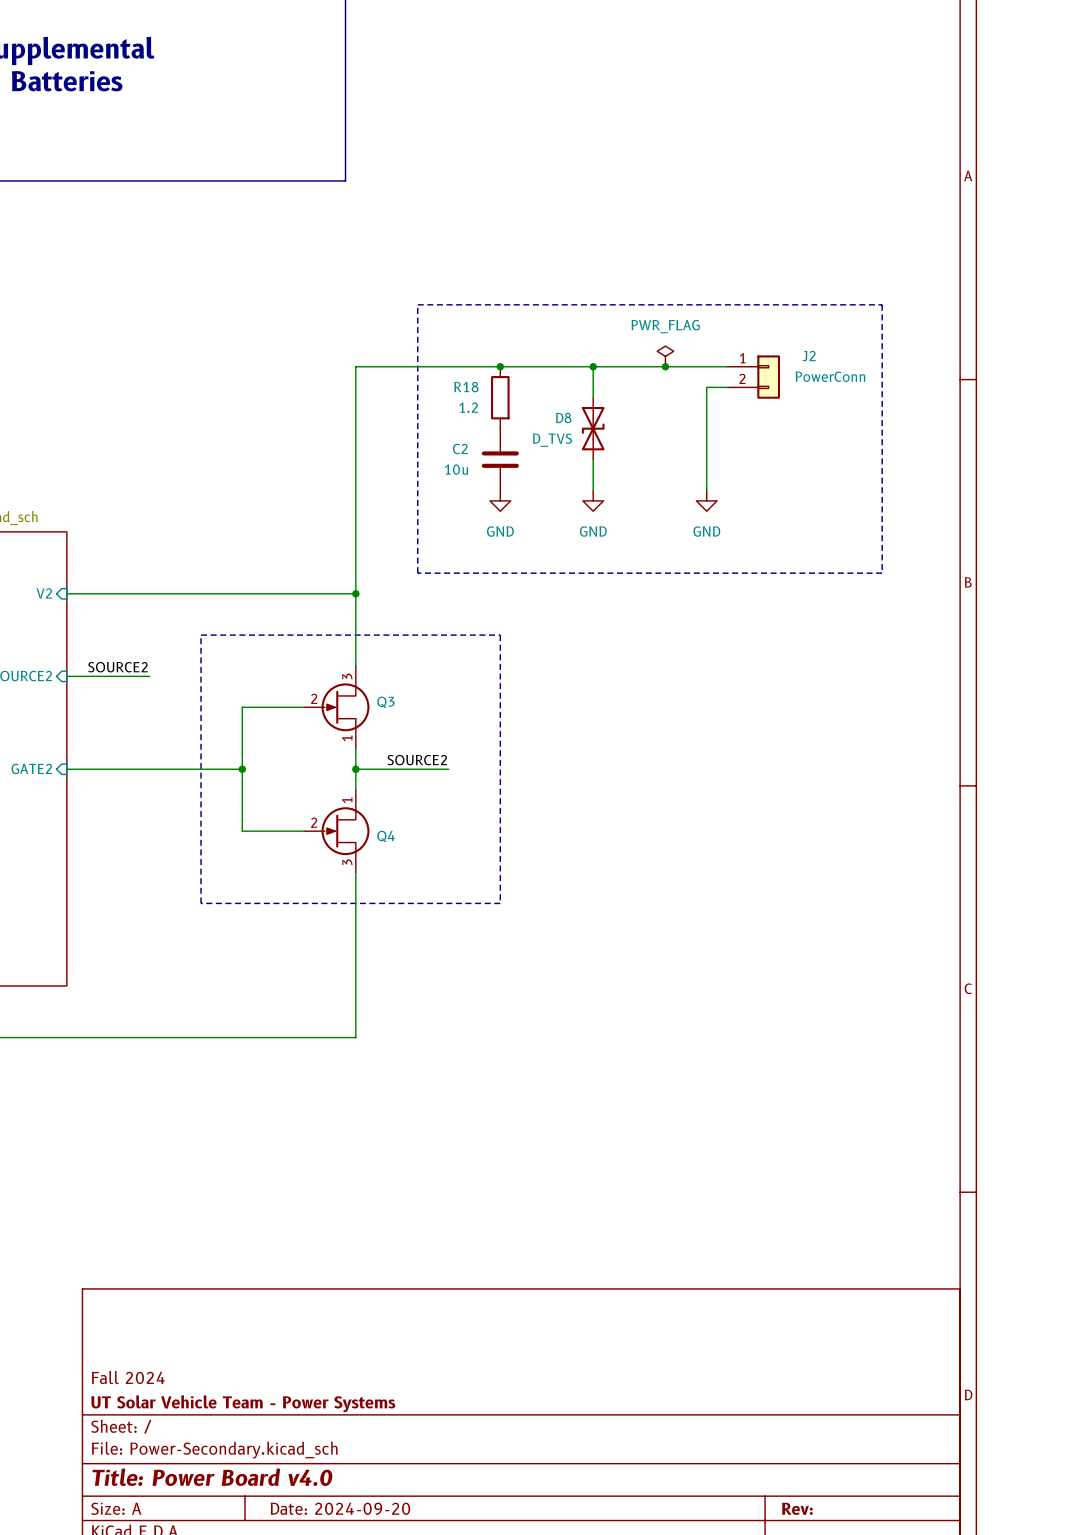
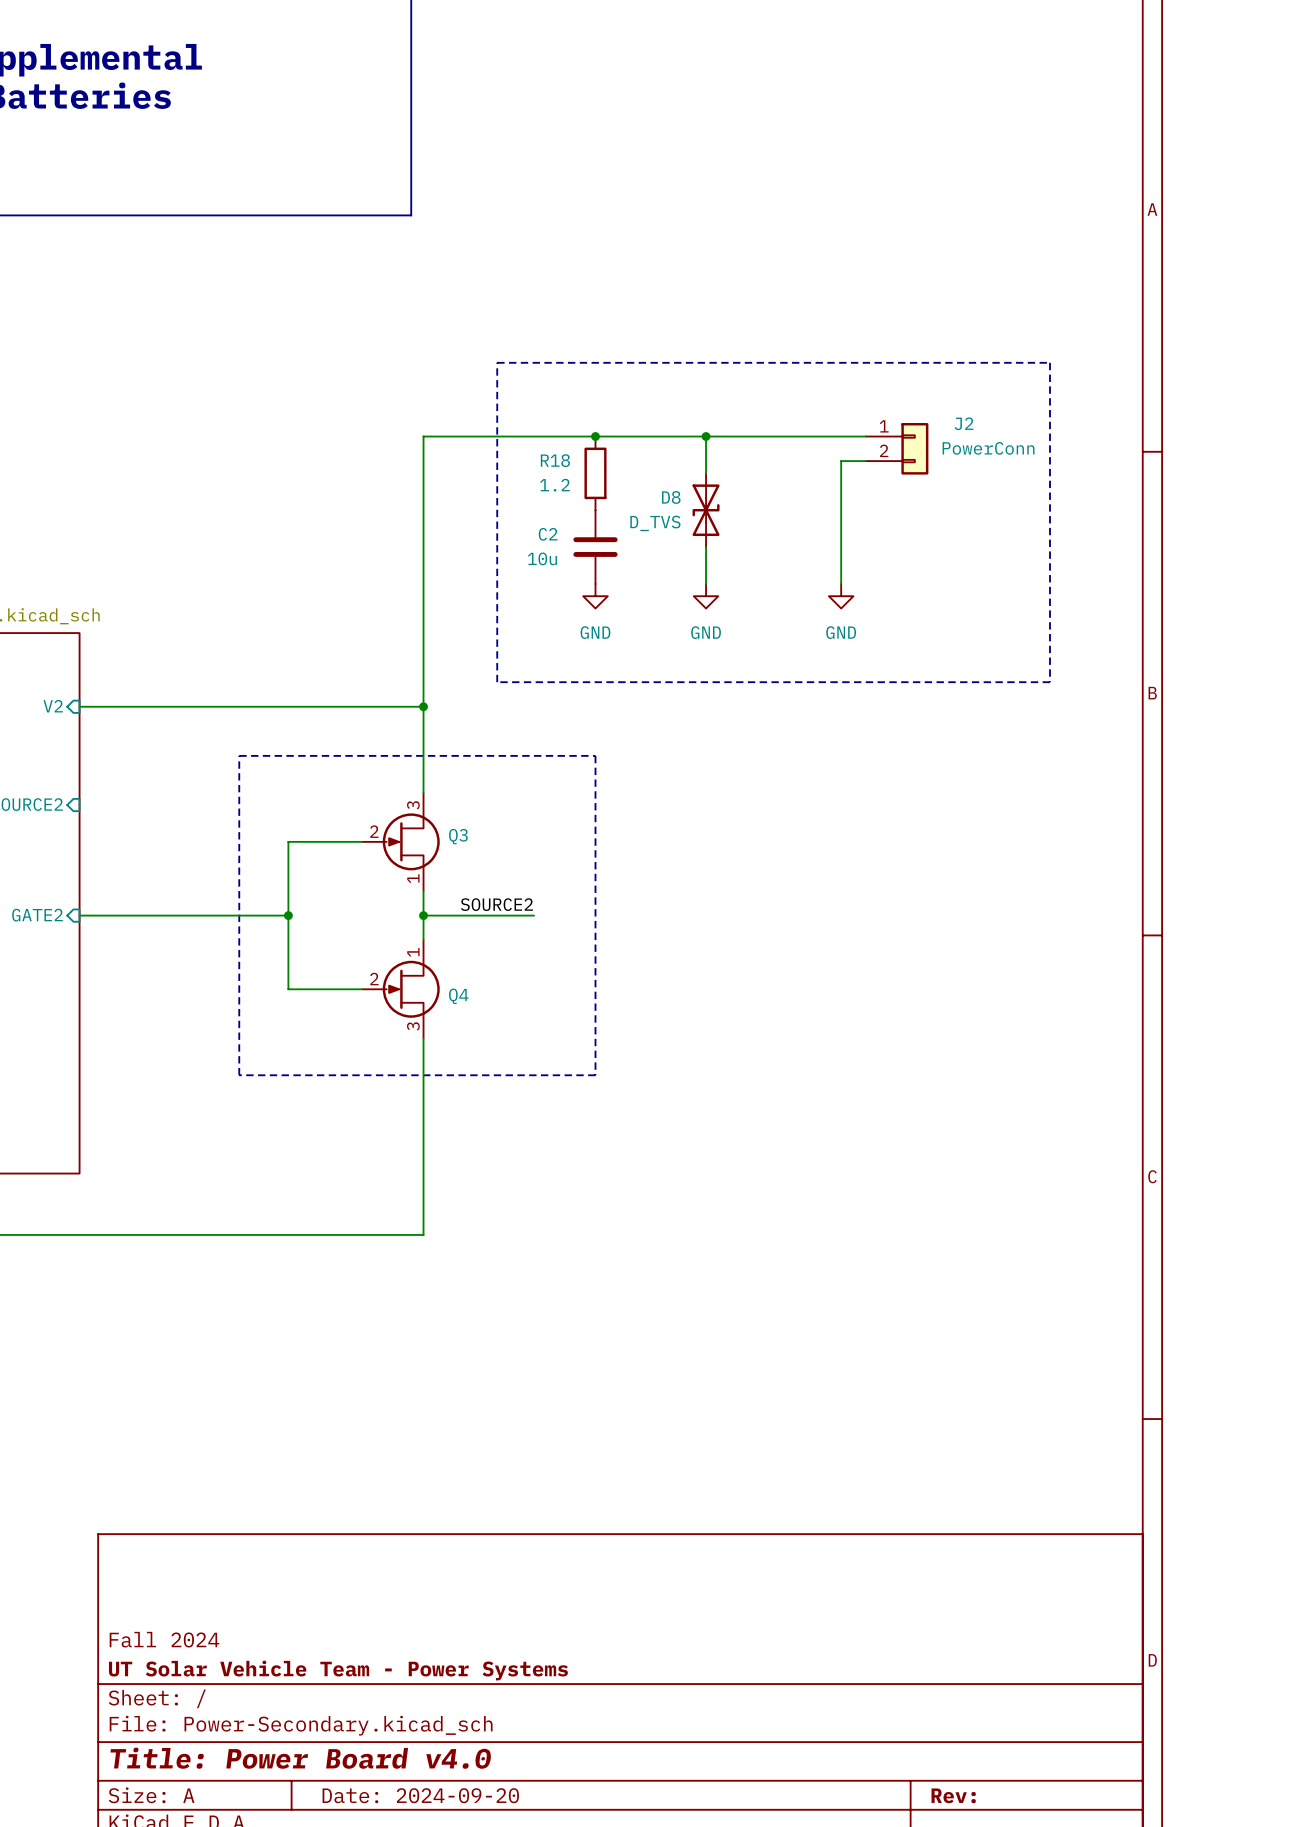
power symbol: PWR_FLAG (665, 356) -> none
junction: (665, 366) -> none
label: SOURCE2 (117, 667) -> none
wire: (66, 676) (149, 676) -> none

